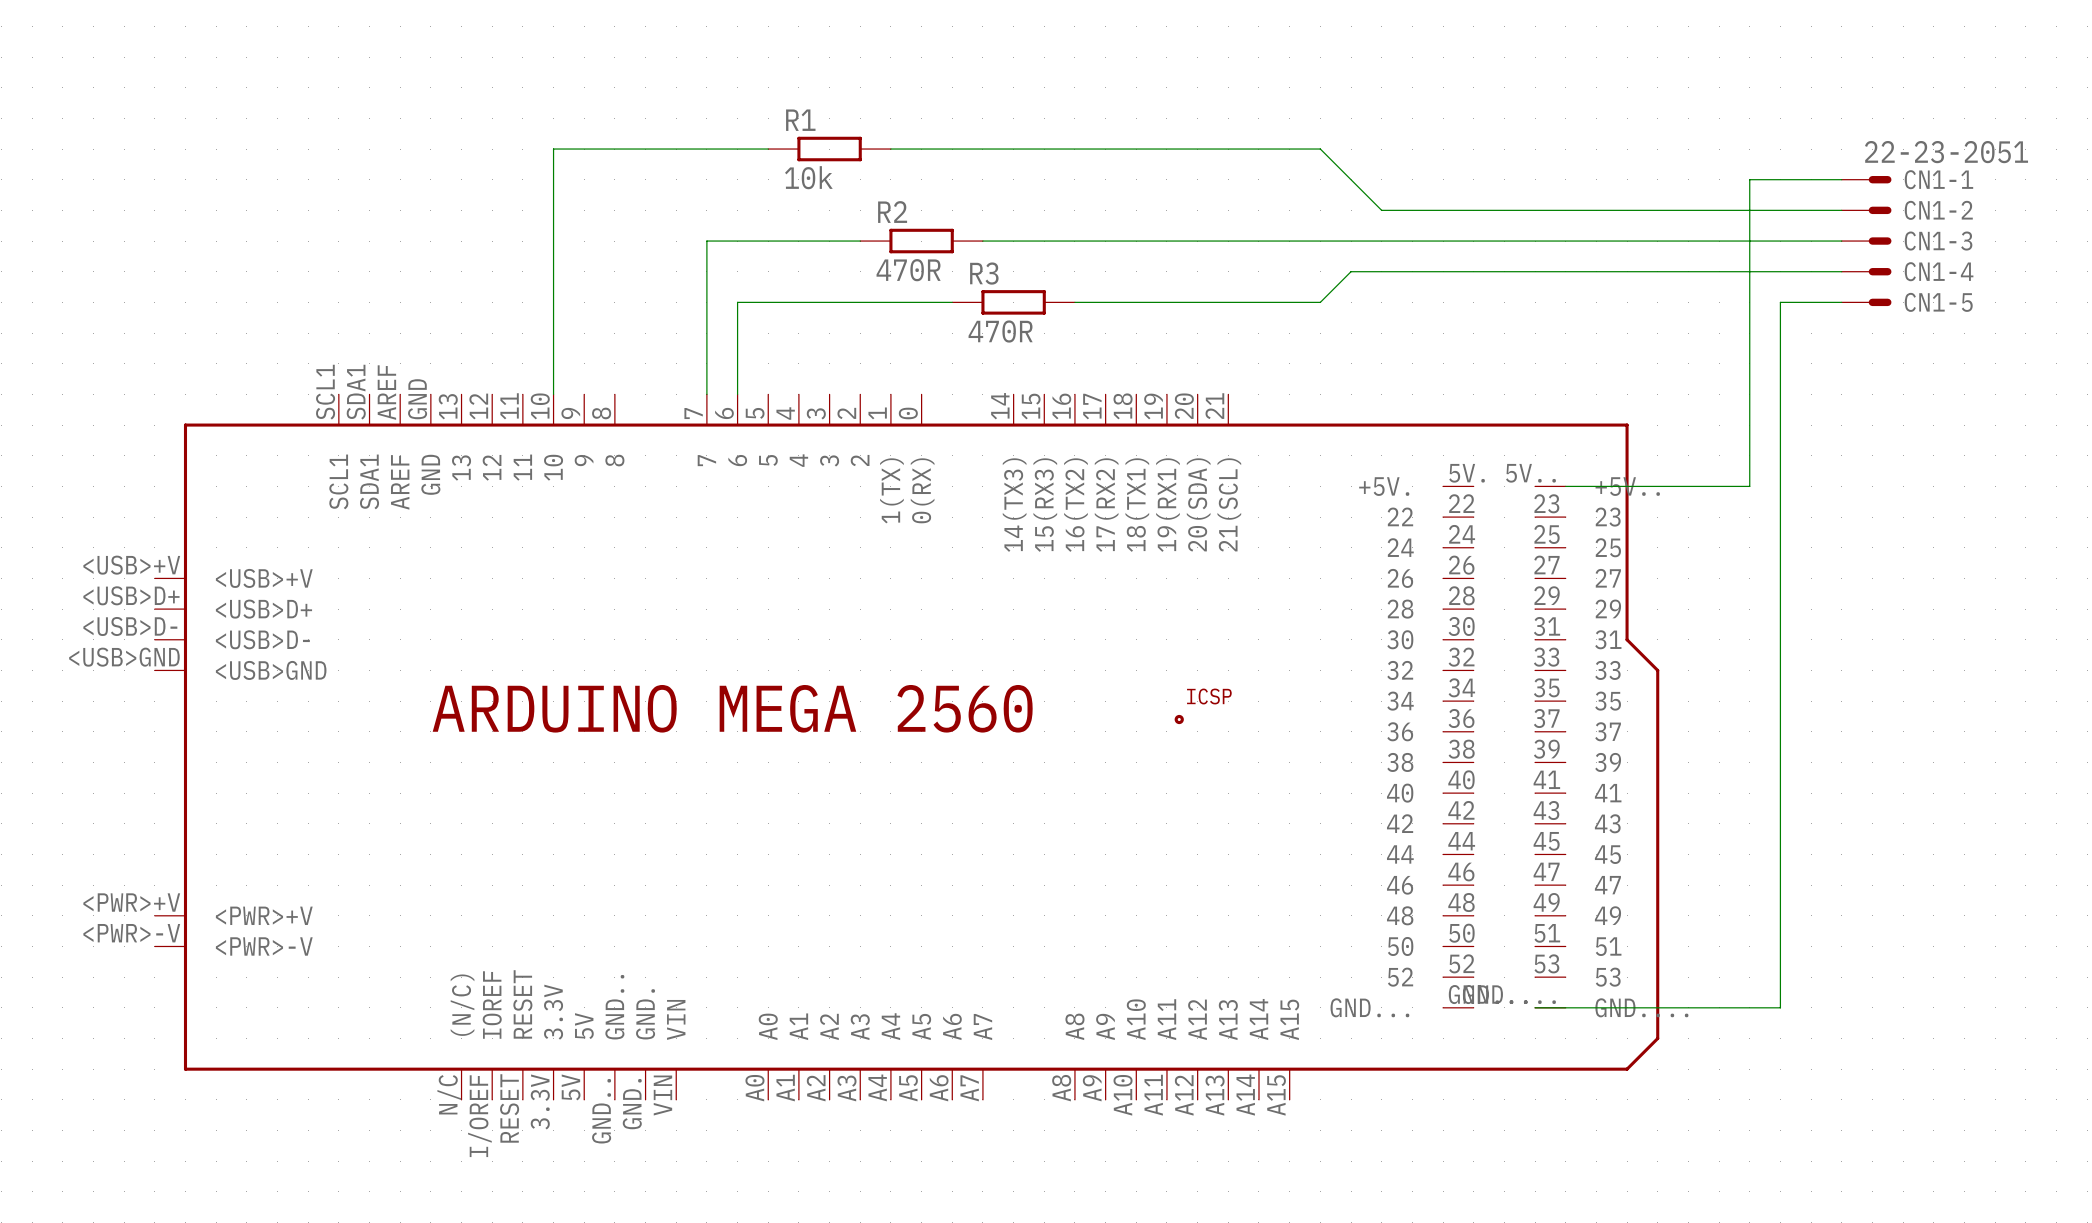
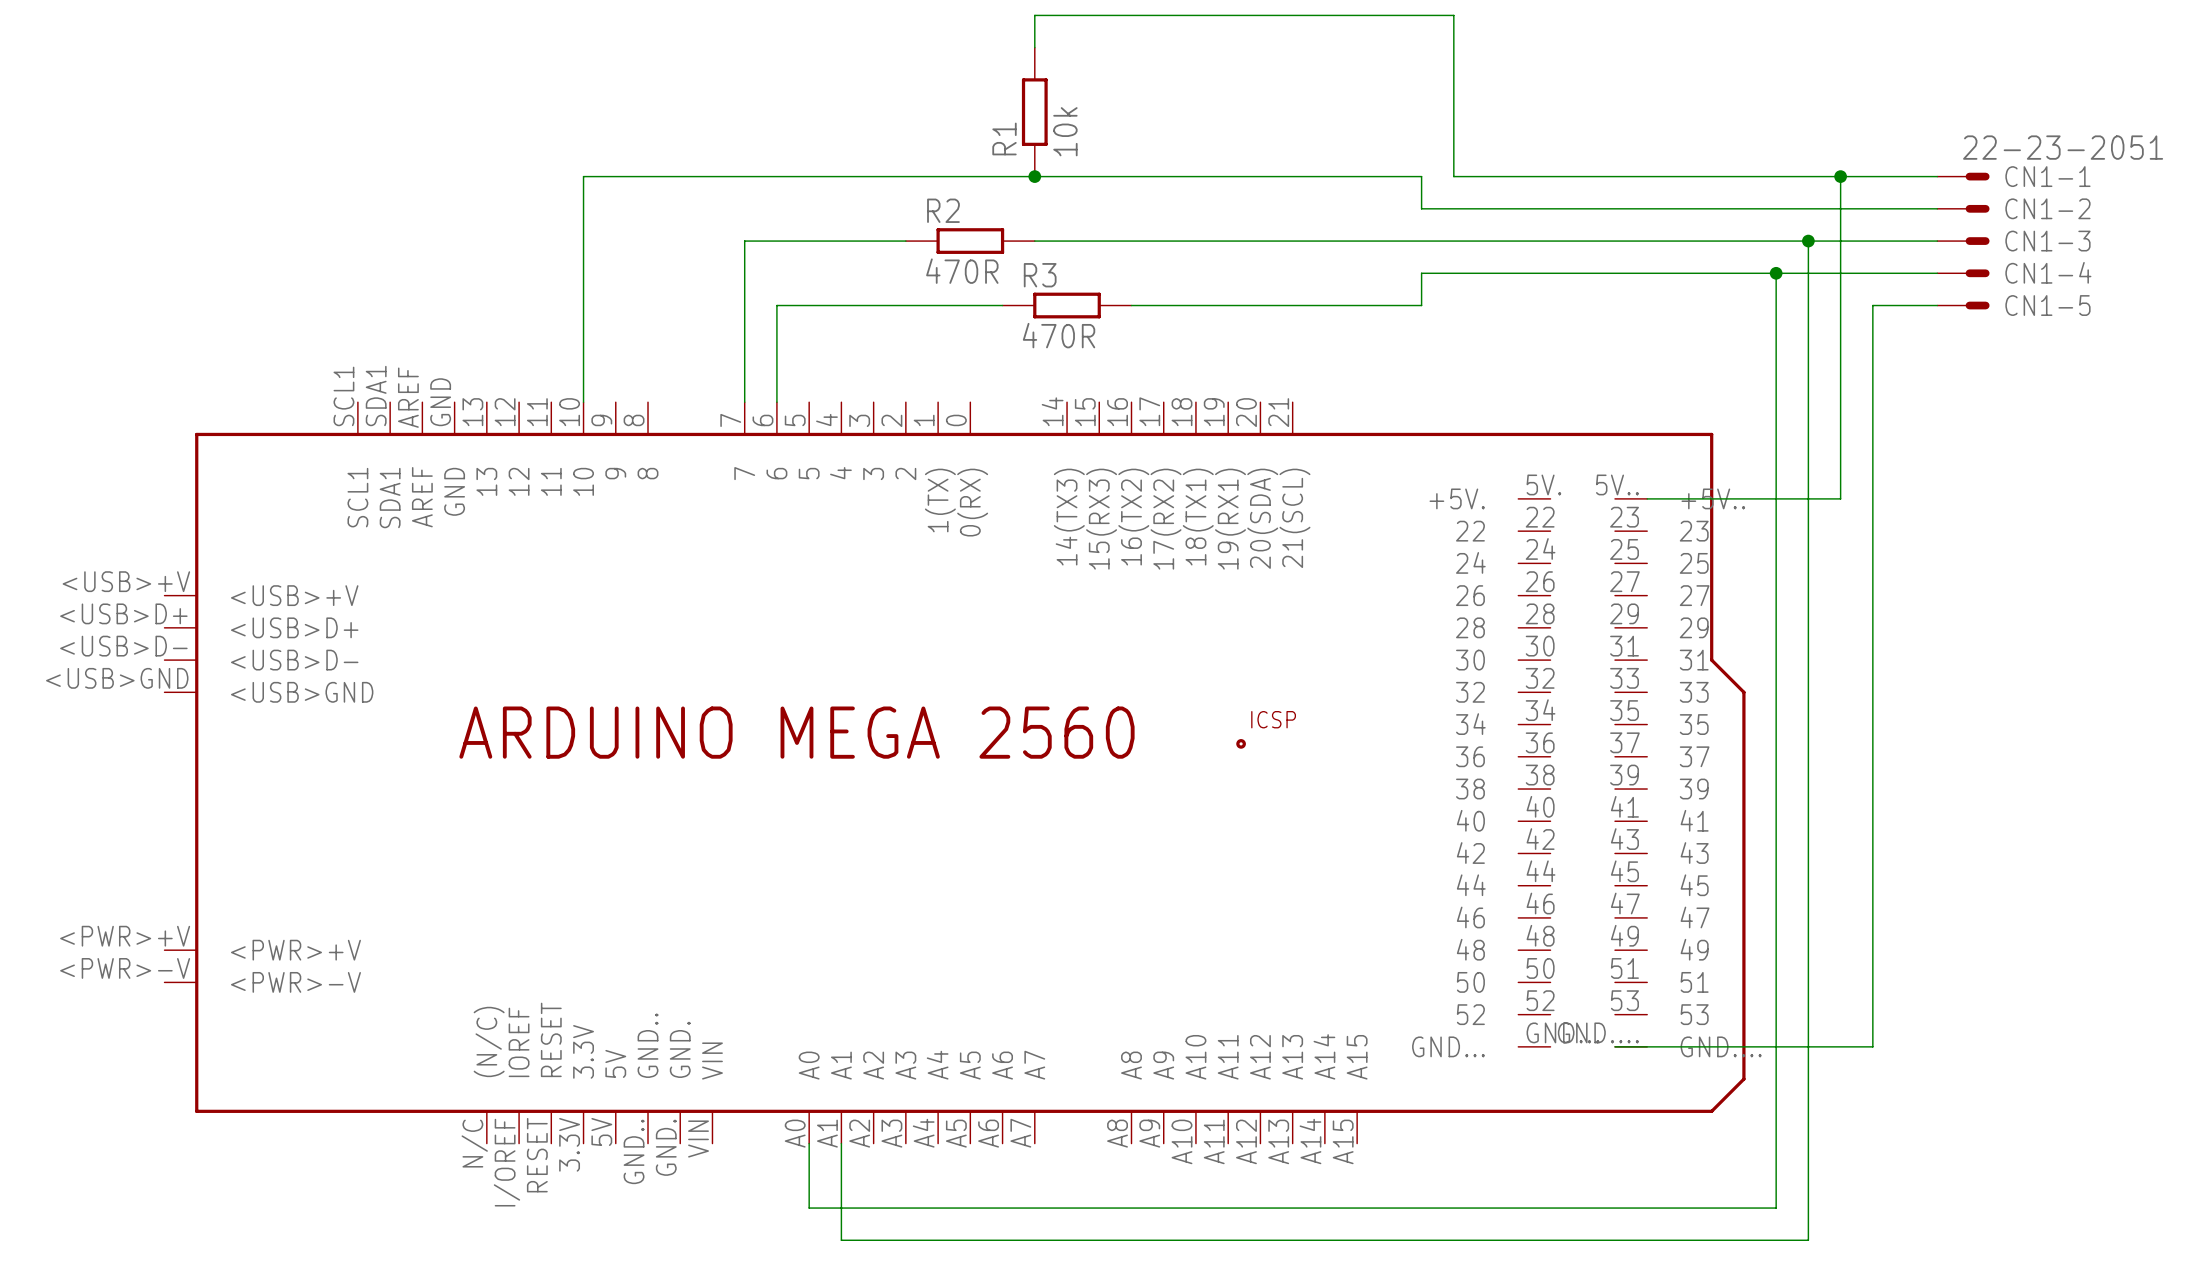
wire: none -> (1034, 47) (1034, 15) (1453, 15) (1453, 176) (1840, 176)
R1 name position: R1 (800, 120) -> R1 (1004, 138)
wire: (768, 149) (553, 149) (553, 179) -> none
R1 rotation: 0° (829, 149) -> 90° clockwise (1034, 112)
R1 position: (829, 149) -> (1034, 112)
wire: (890, 149) (1320, 149) (1381, 210) -> (583, 176) (1421, 176) (1421, 208) (1453, 208)
R1 value position: 10k (808, 177) -> 10k (1065, 131)
junction: none -> (1034, 176)
junction: none -> (1840, 176)
wire: none -> (1808, 241) (1808, 1240) (841, 1240) (841, 1143)
junction: none -> (1808, 241)
wire: (1351, 271) (1320, 302) -> (1421, 273) (1421, 305) (1389, 305)
wire: none -> (1776, 273) (1776, 1208) (809, 1208) (809, 1143)
junction: none -> (1776, 273)

